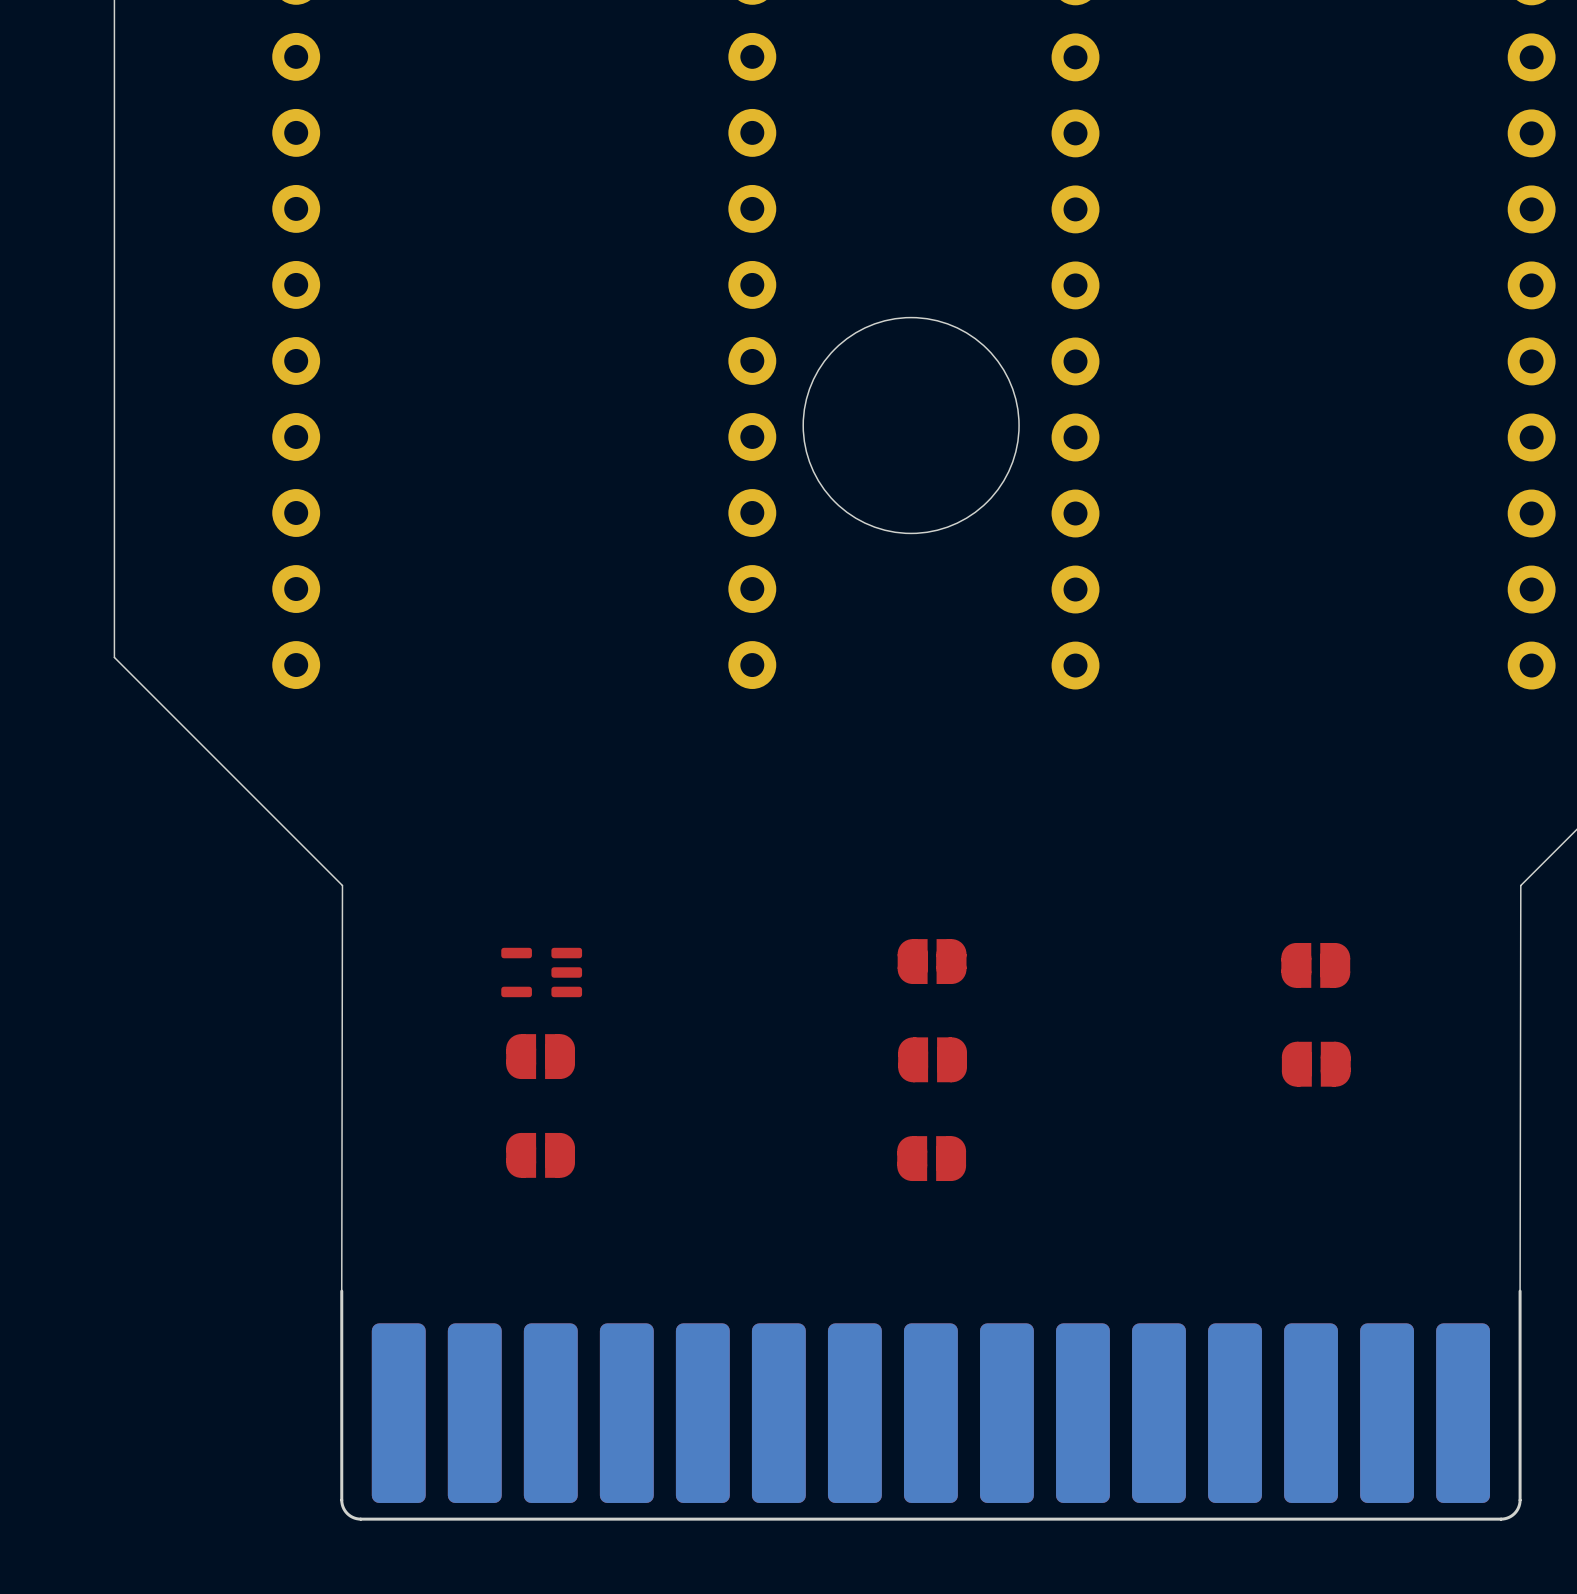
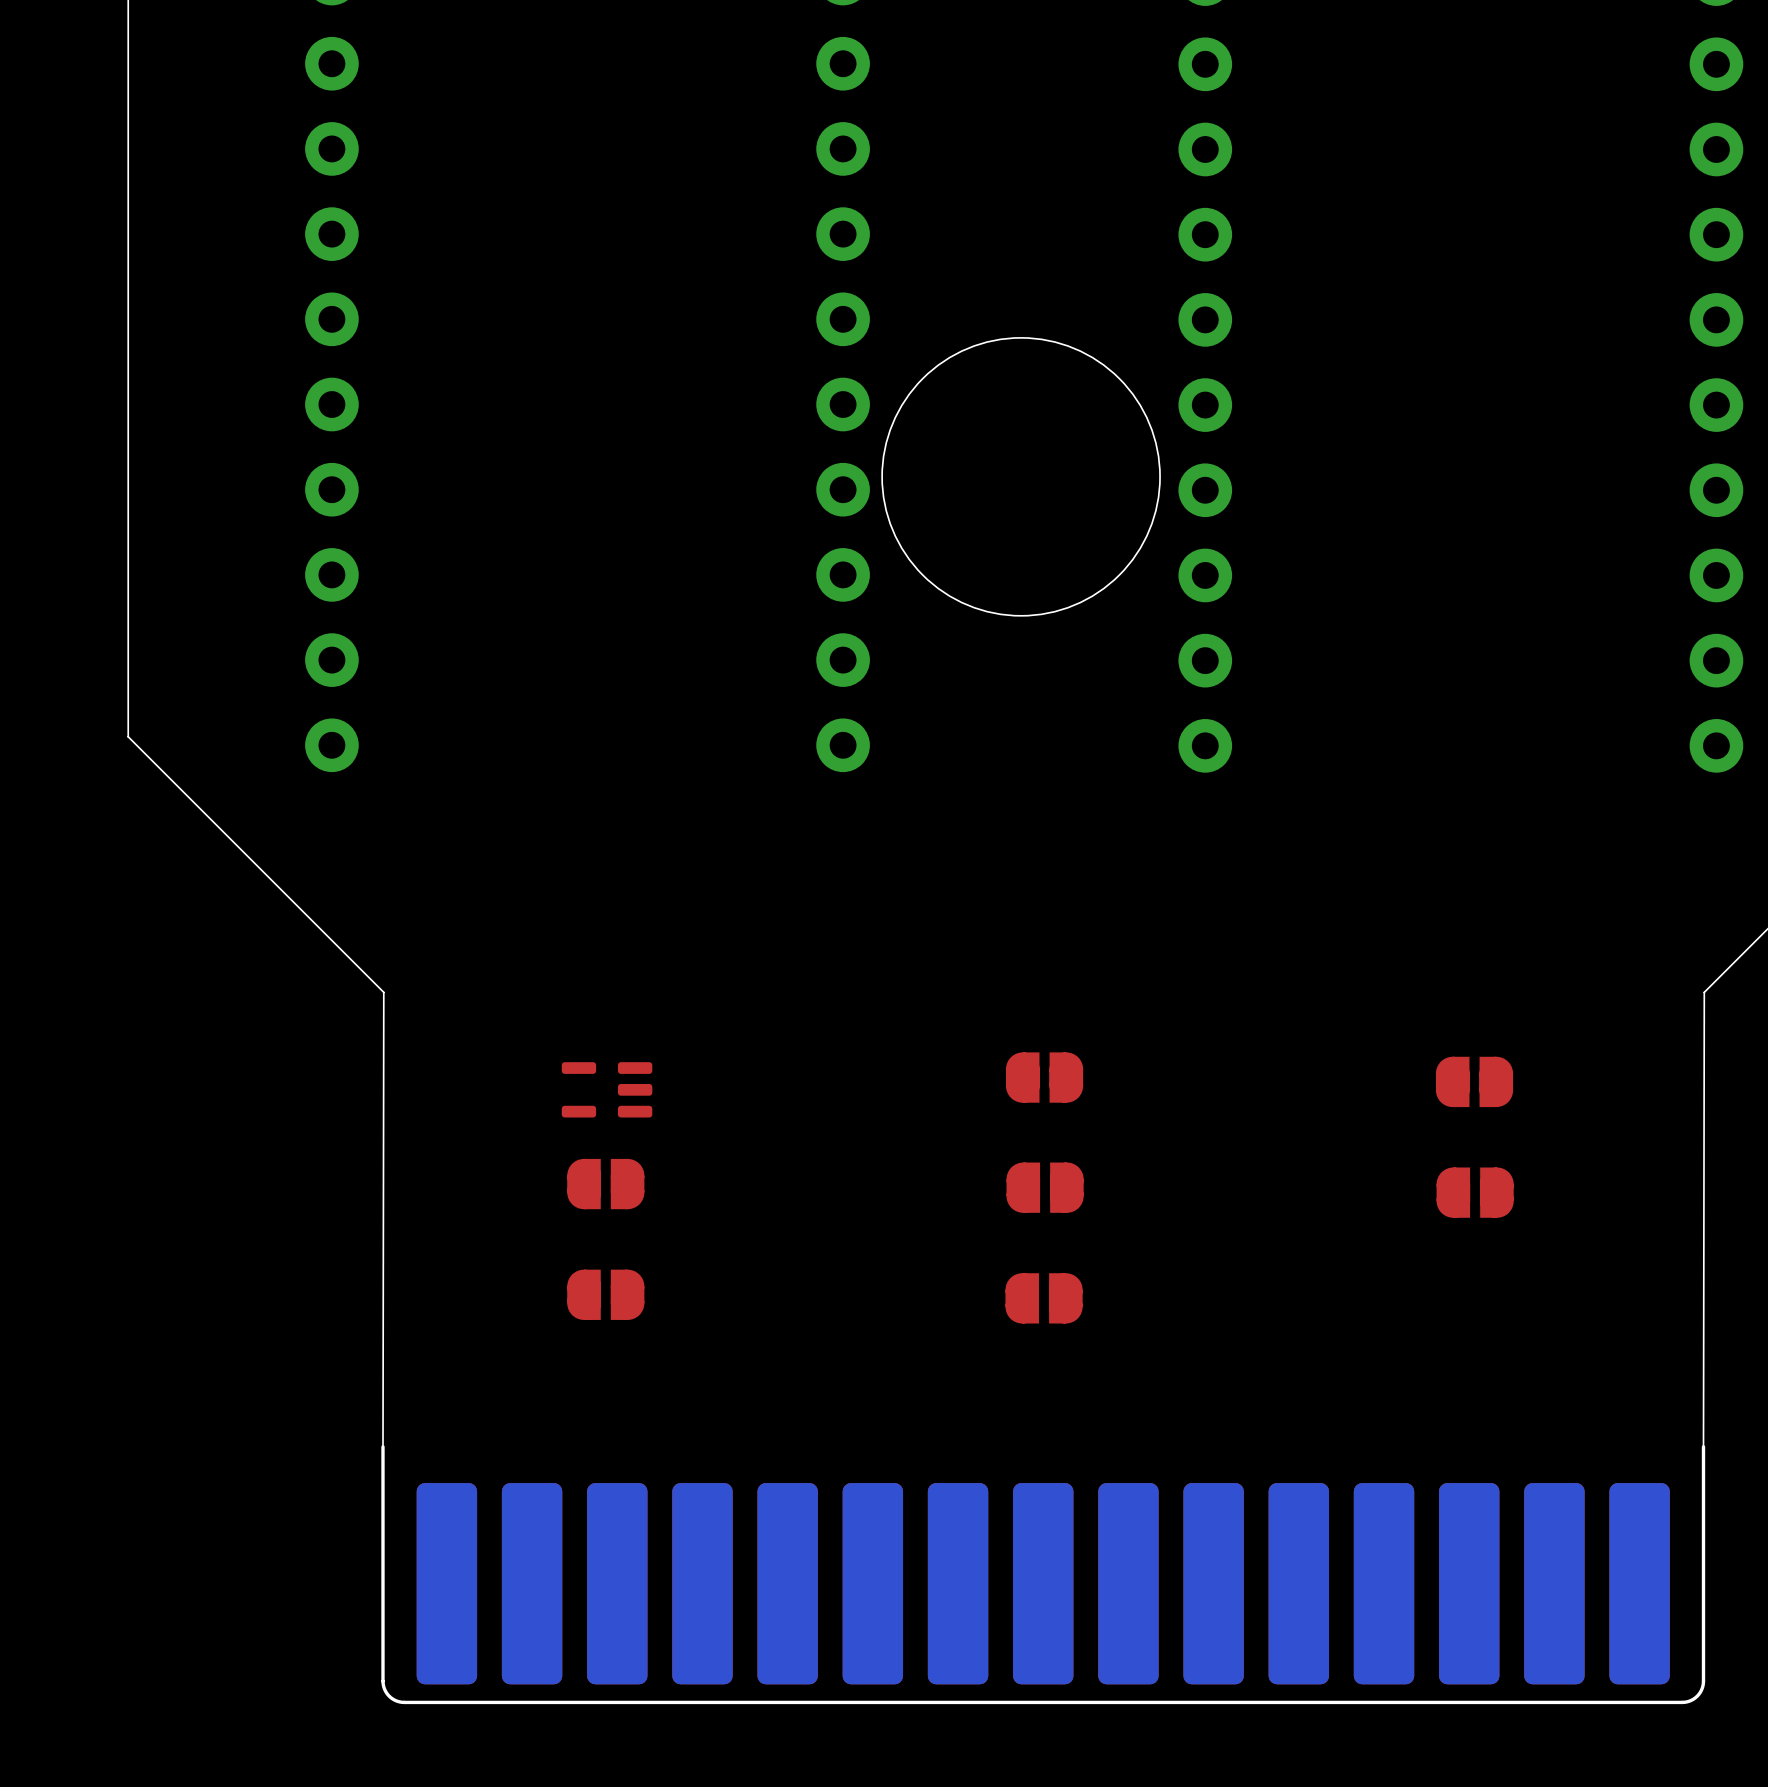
round board edge size: [802, 316, 1020, 535] -> [881, 337, 1161, 617]

